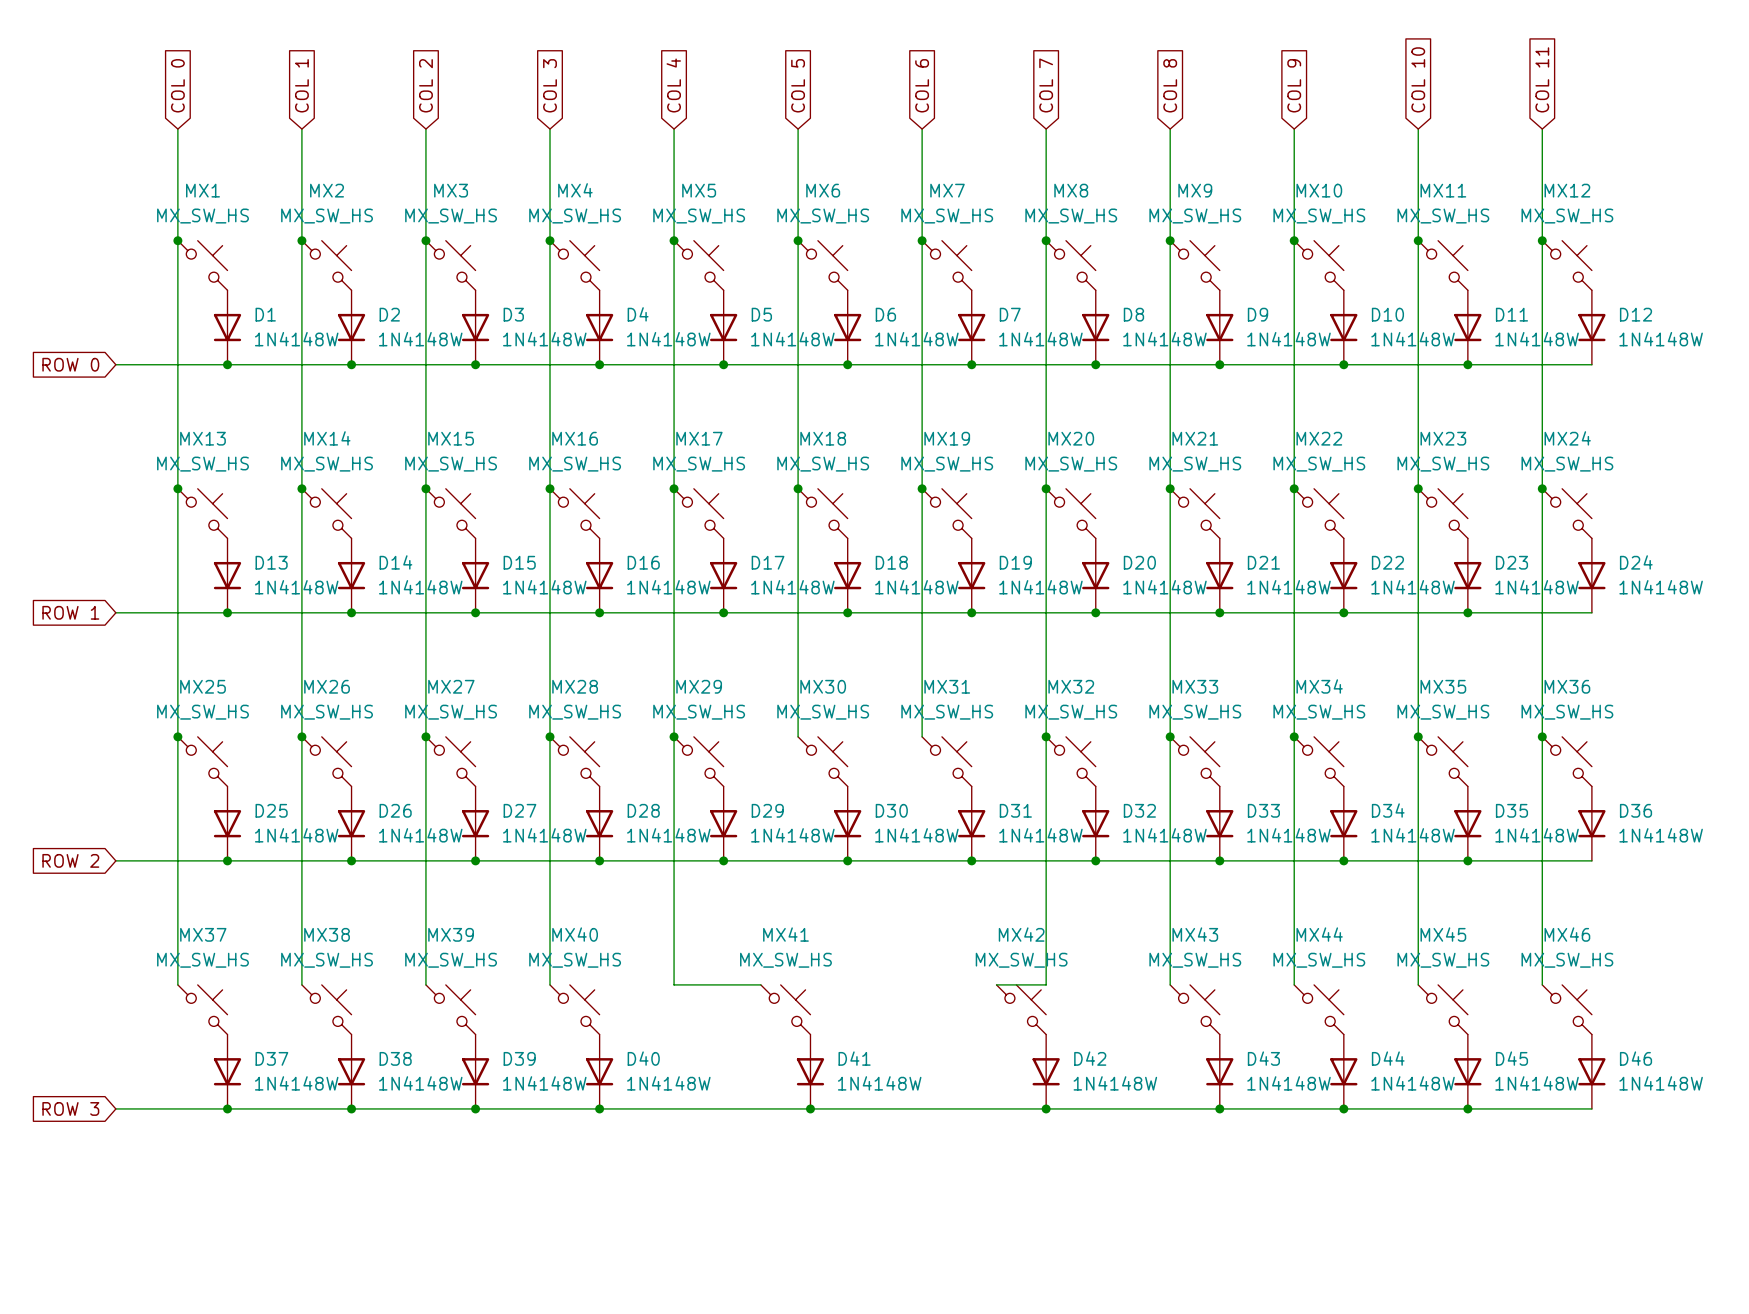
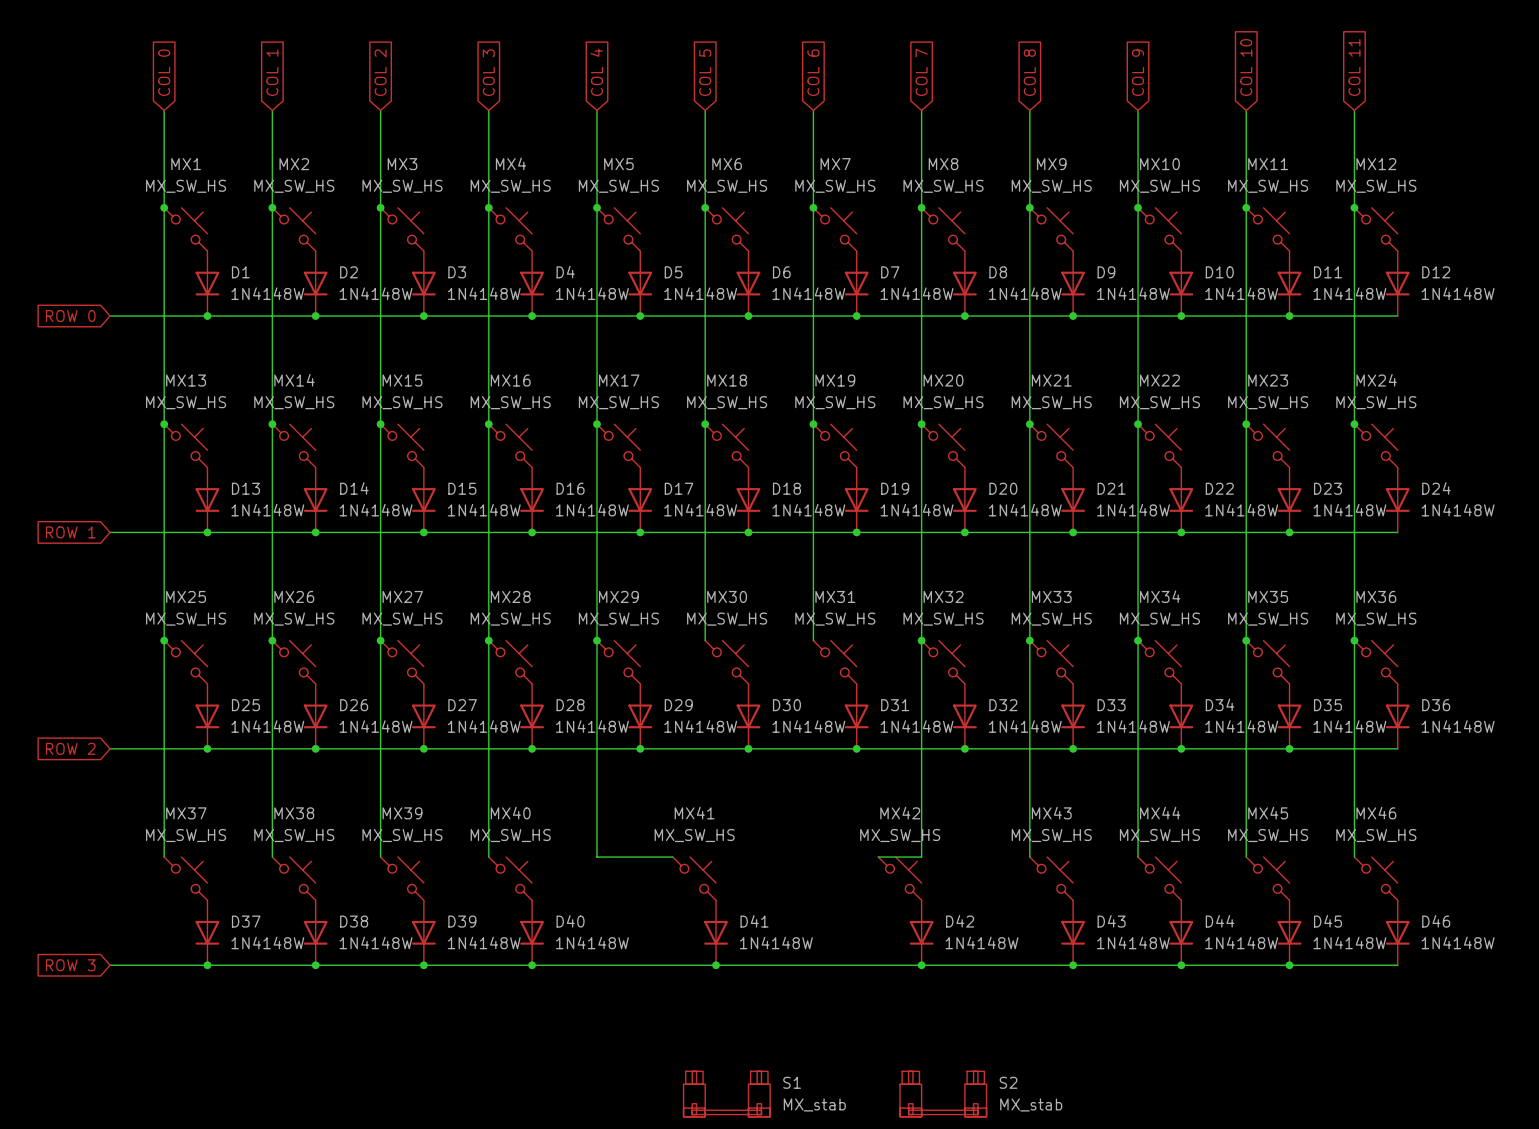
S1: none -> MX_stab (726, 1094)
S2: none -> MX_stab (943, 1094)

